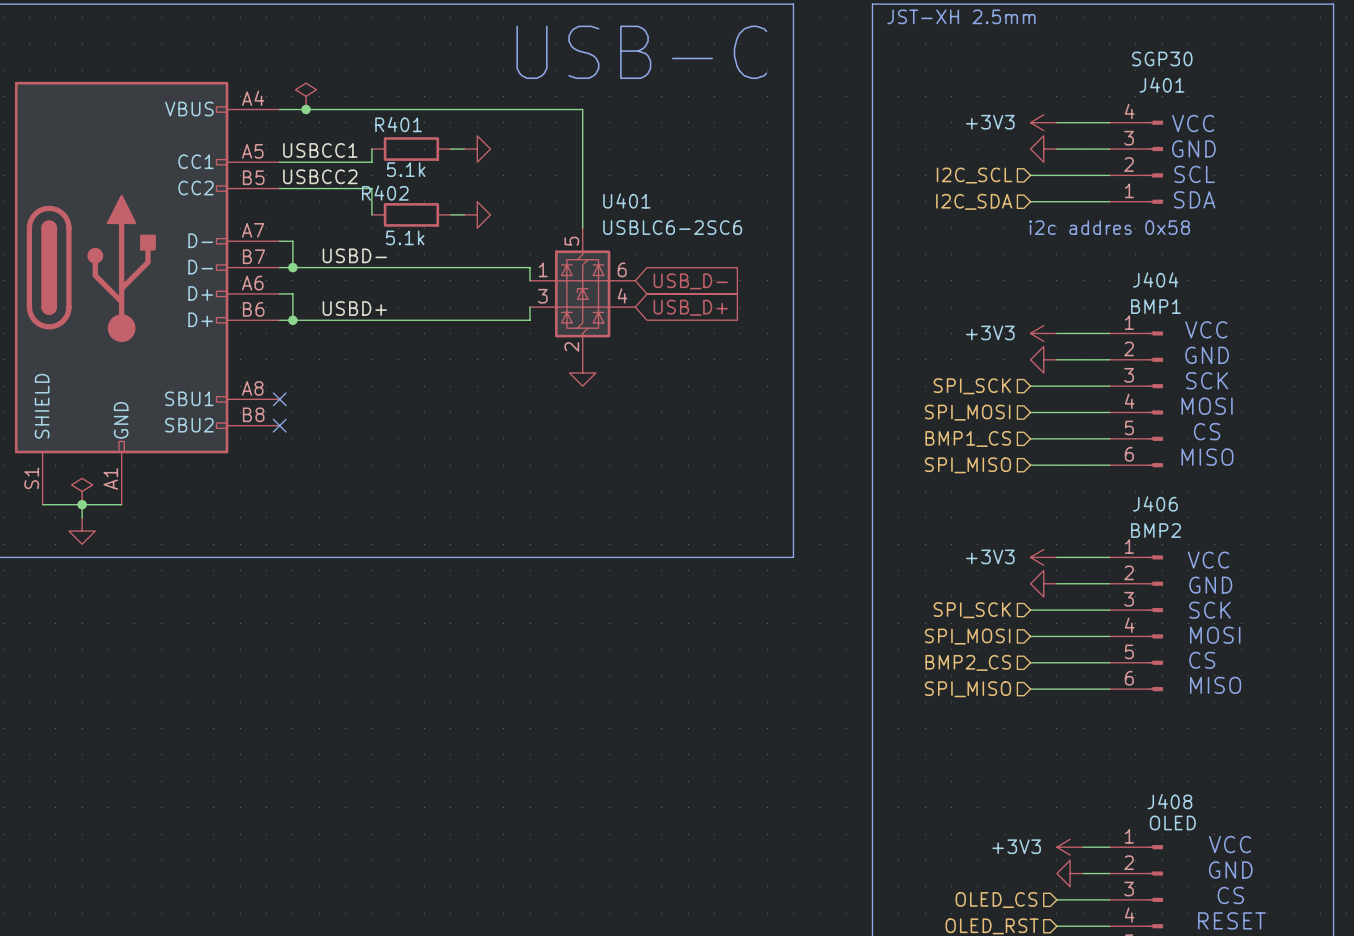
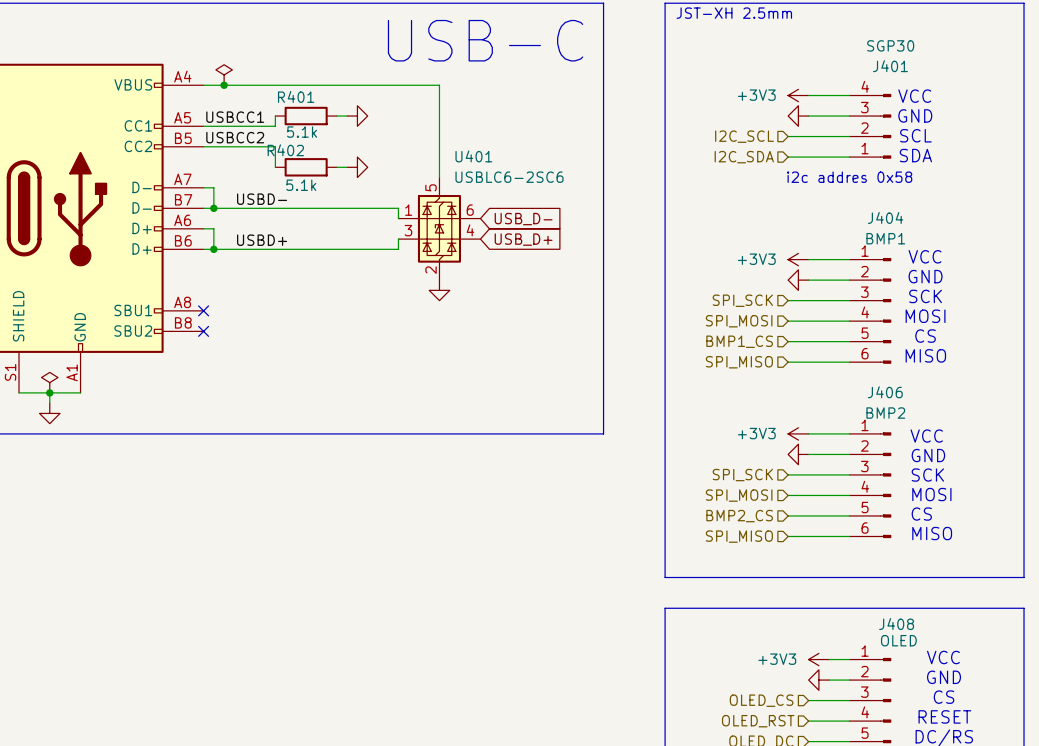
line: (872, 741) (872, 781) -> (665, 577) (1024, 577)
line: (1333, 741) (1333, 781) -> (665, 608) (1024, 608)

